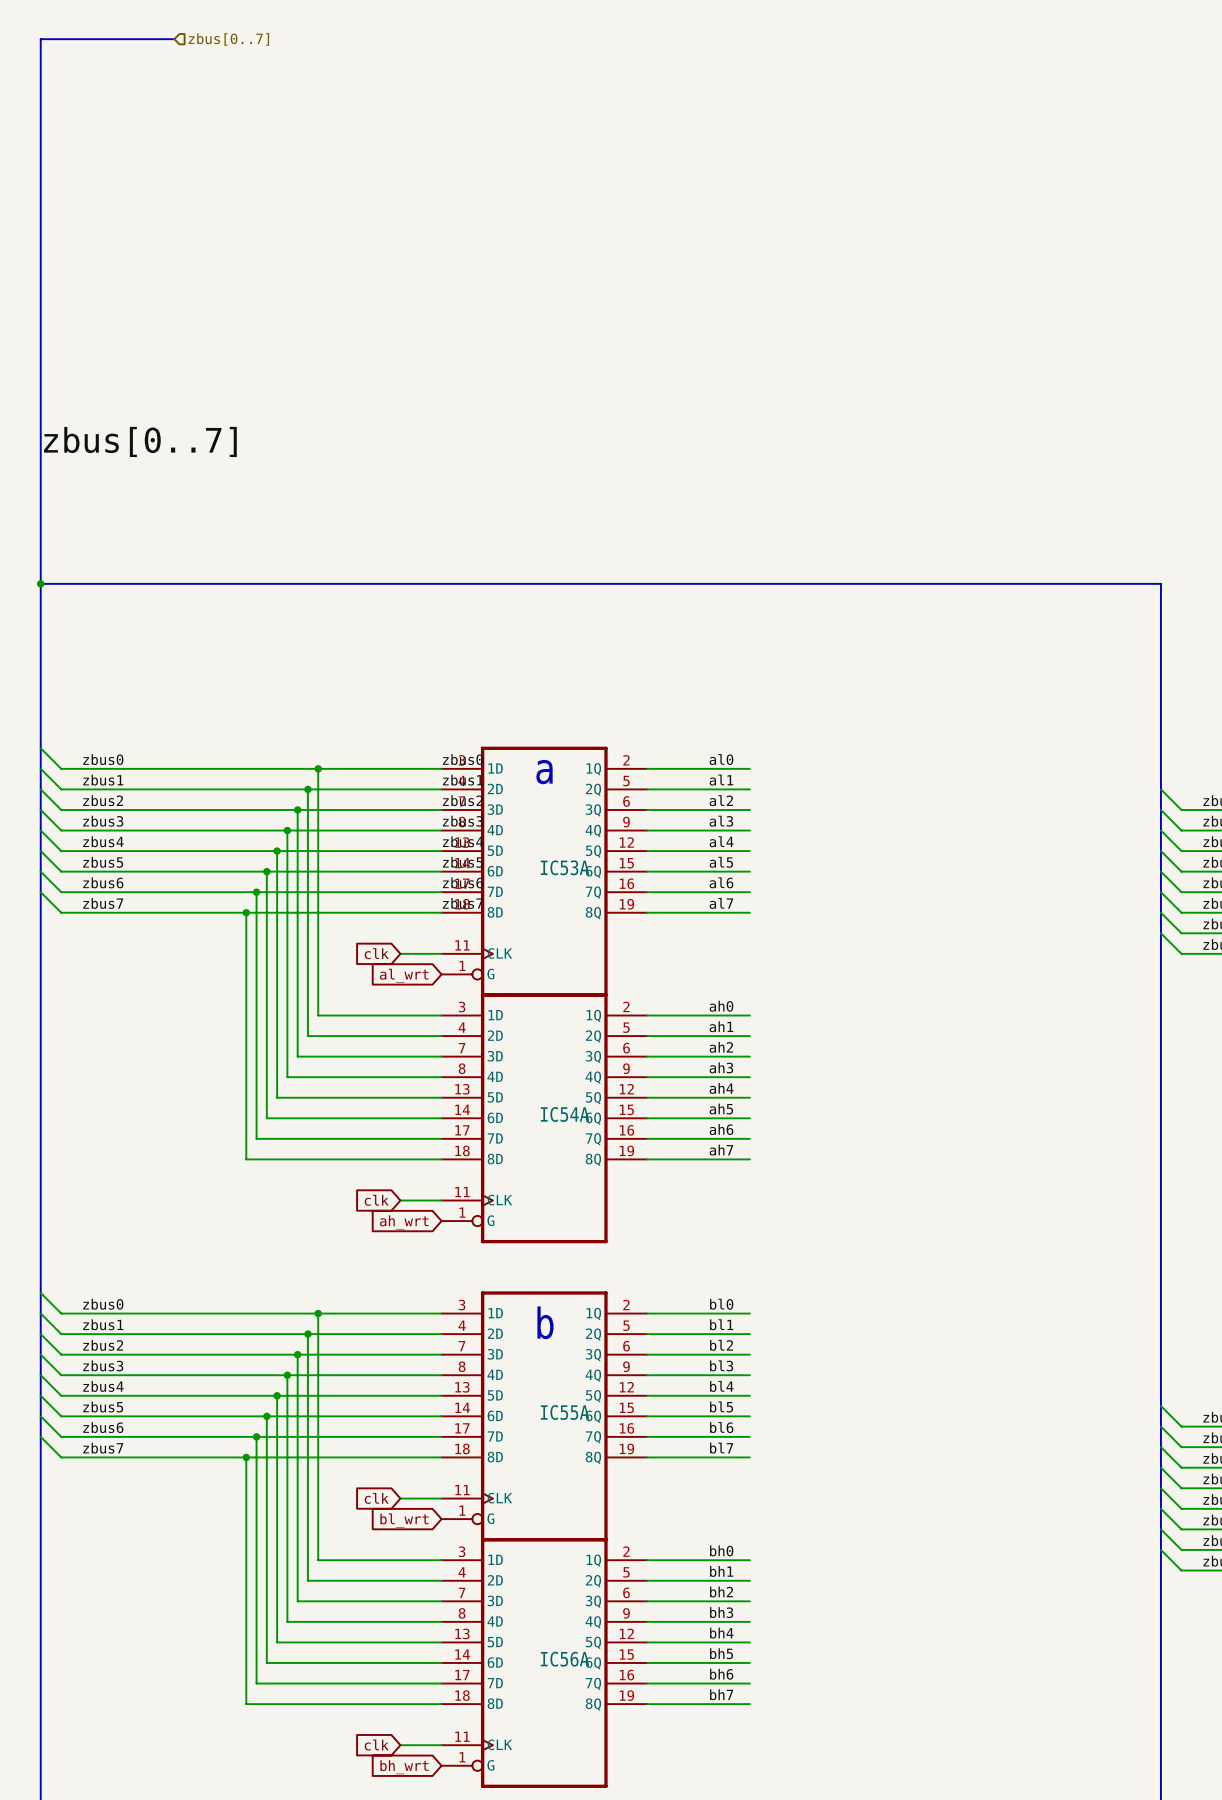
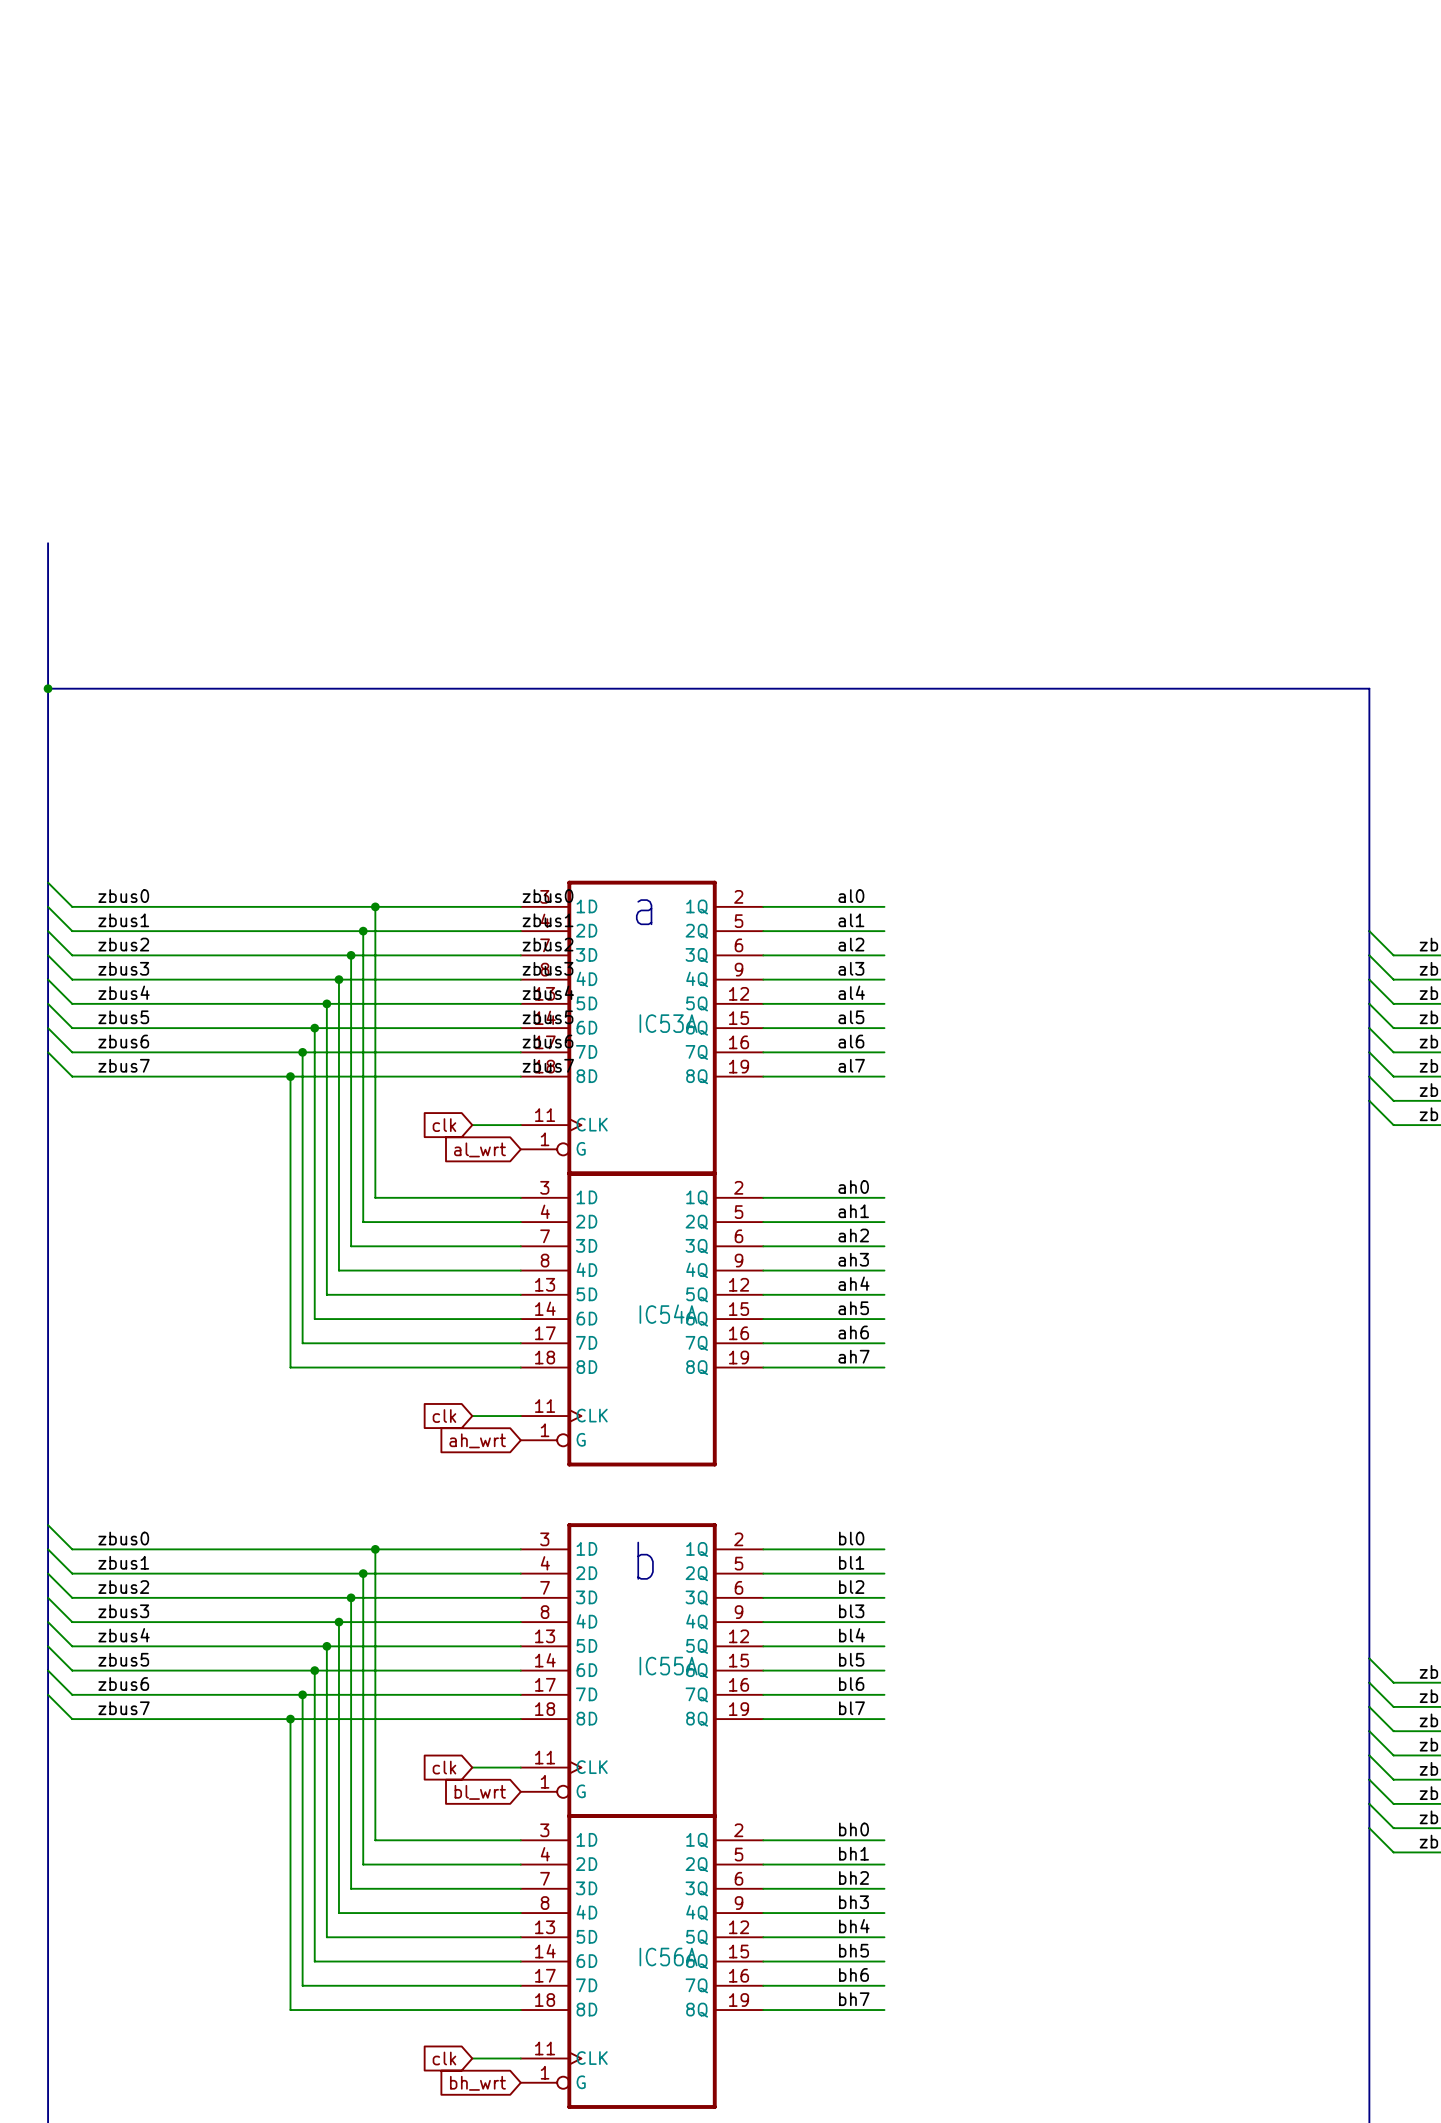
bus: (174, 39) (40, 39) (40, 460) -> none
hierarchical label: zbus[0..7] (228, 39) -> none
label: zbus[0..7] (140, 441) -> none

